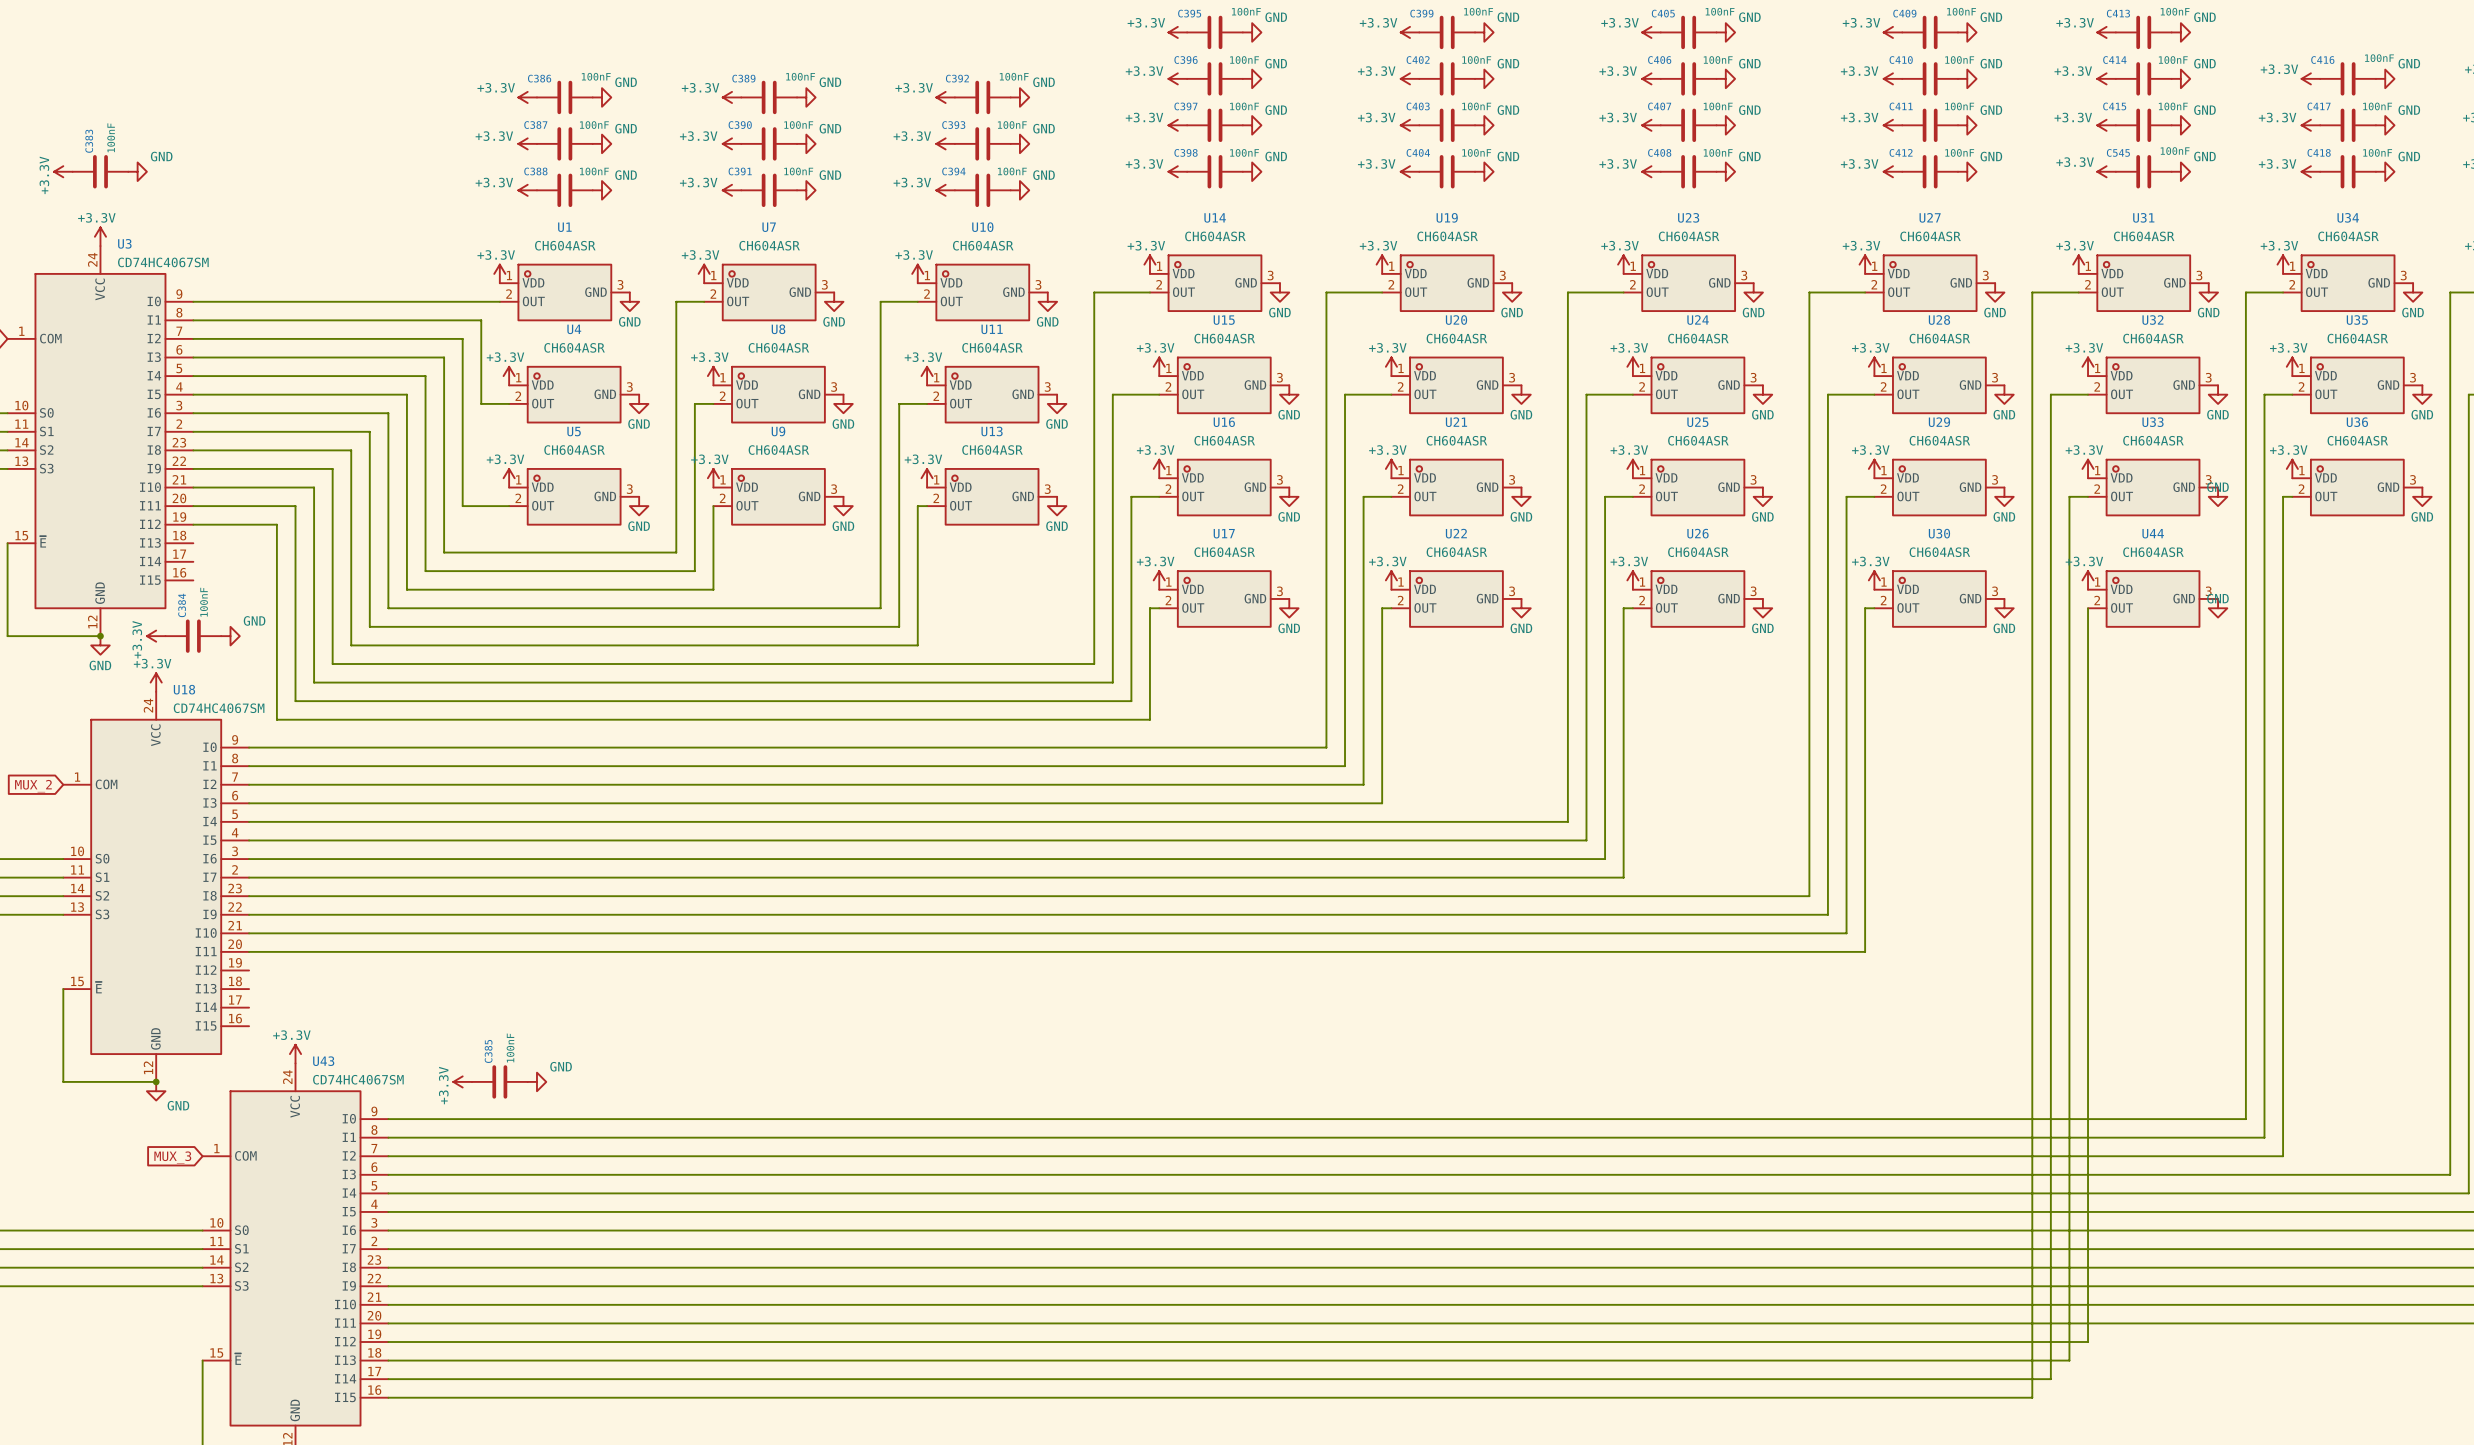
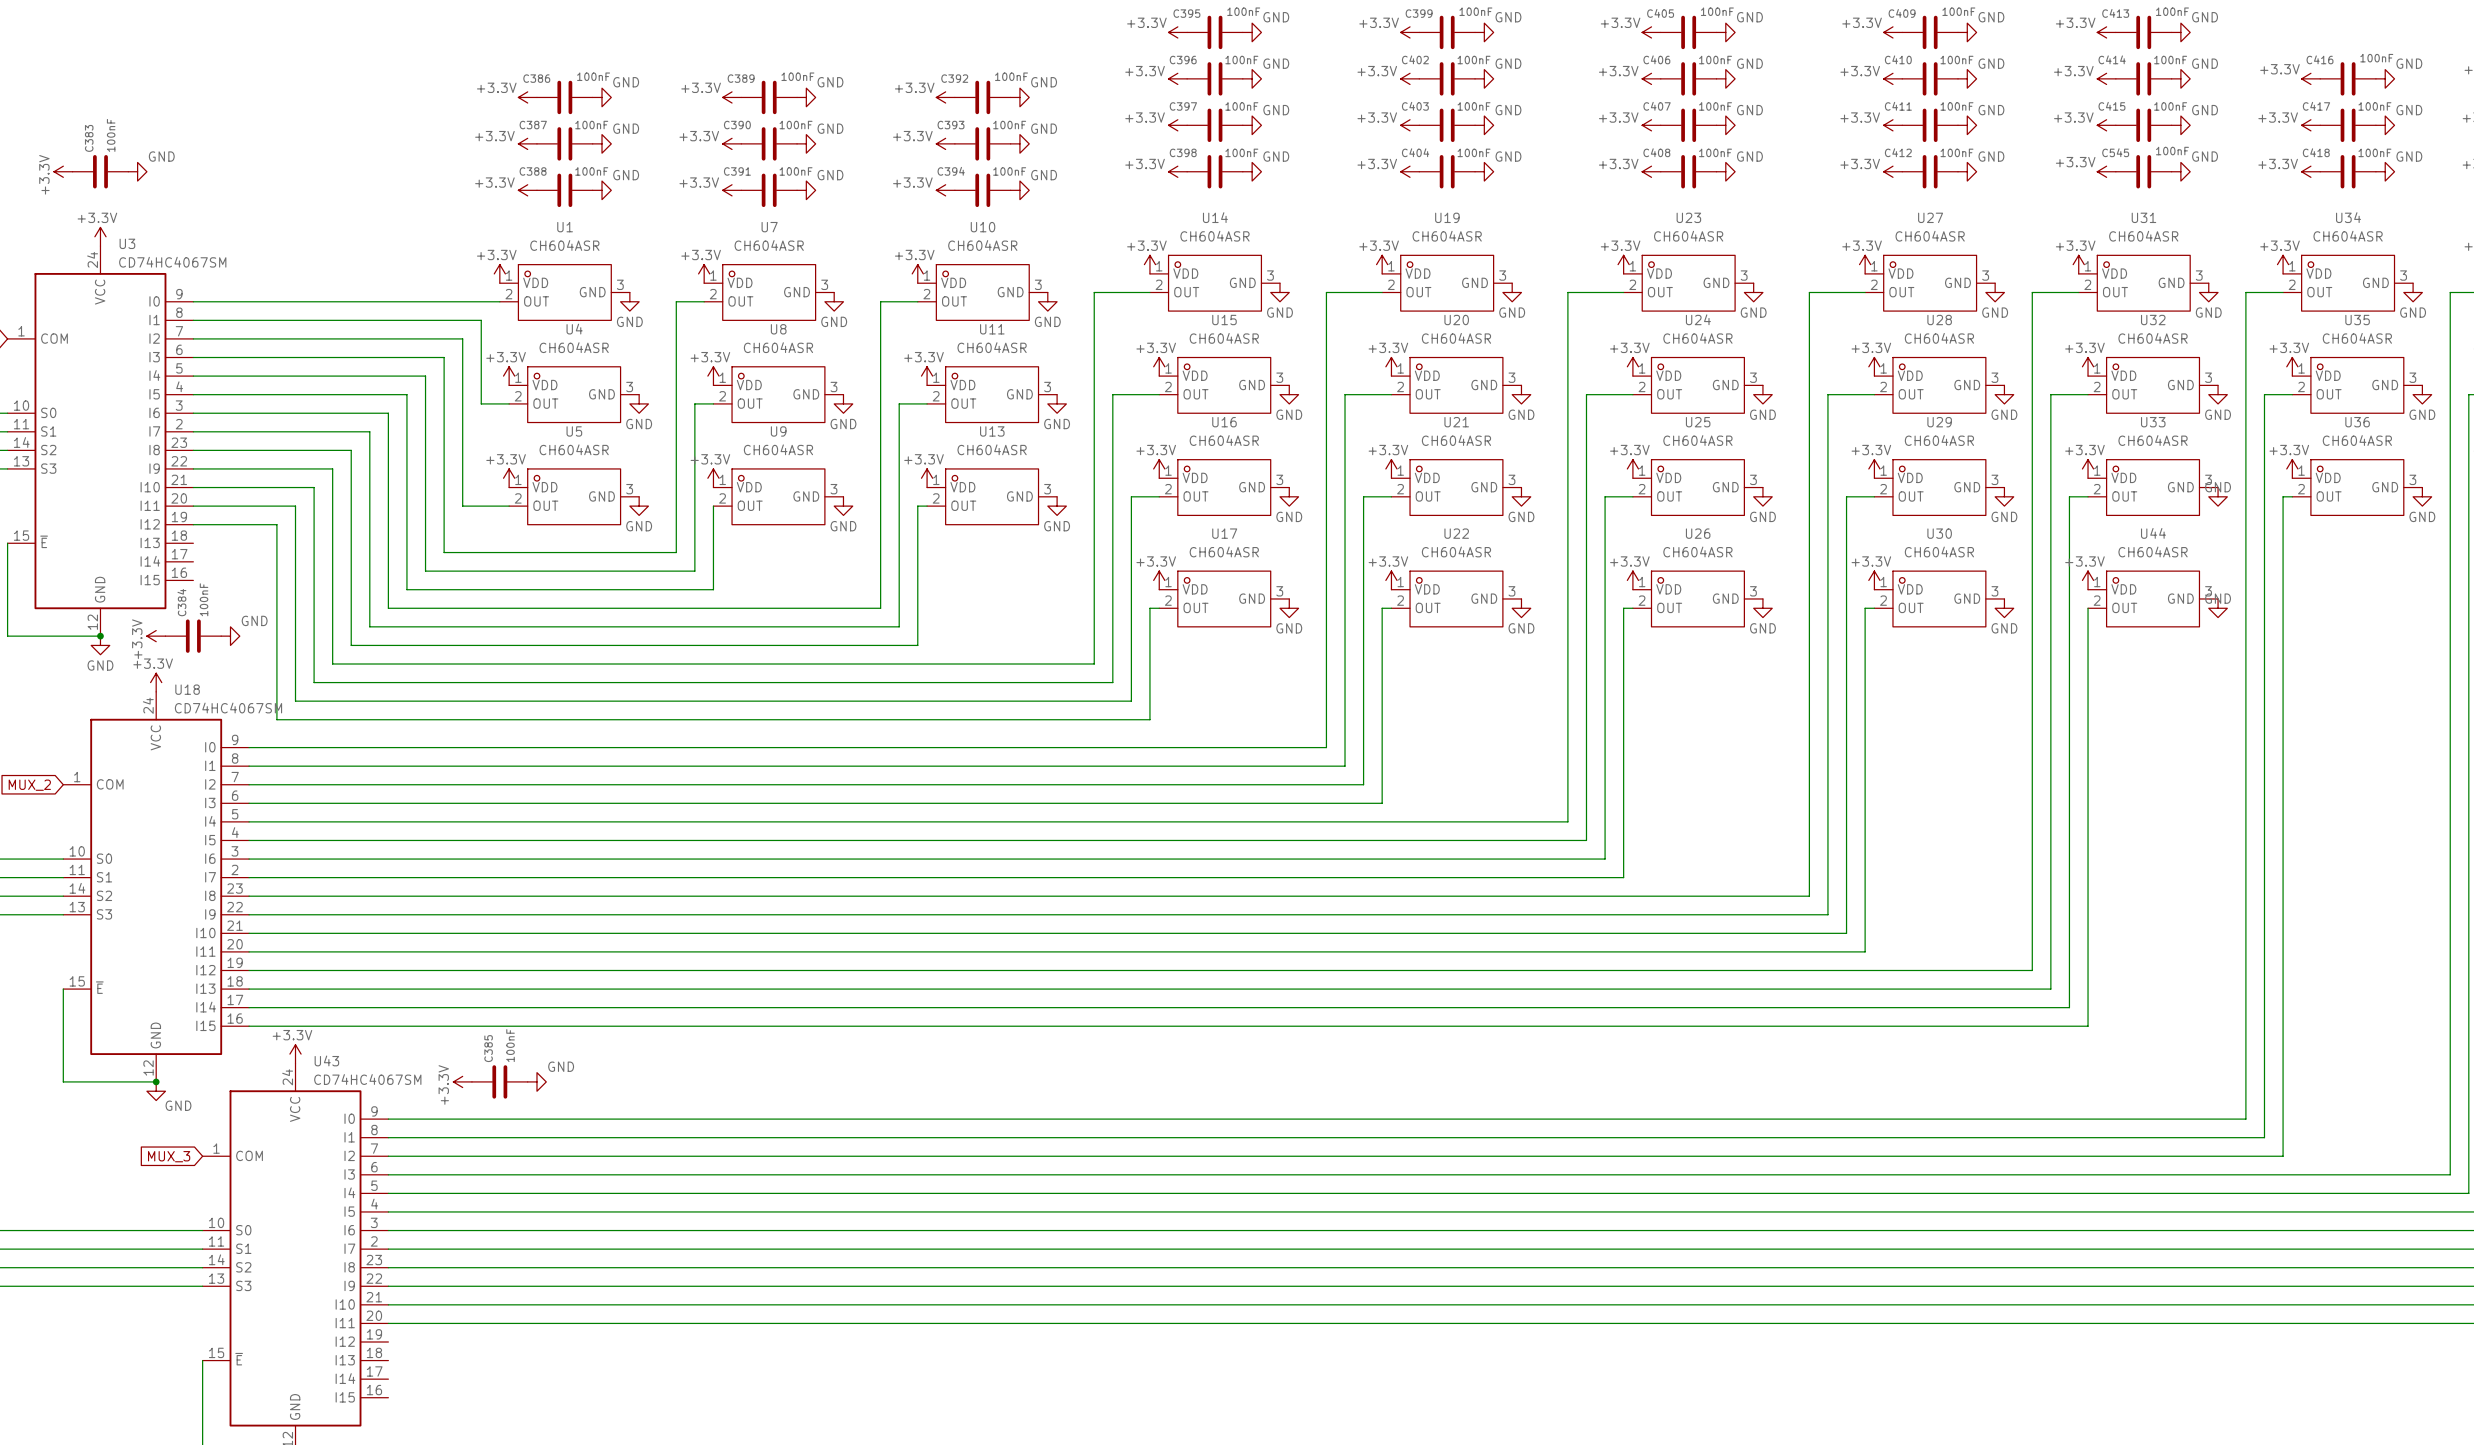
wire: (2032, 970) (2032, 1397) (388, 1397) -> (2032, 970) (249, 970)
wire: (2050, 989) (2050, 1379) (388, 1379) -> (2050, 989) (249, 989)
wire: (2069, 1007) (2069, 1360) (388, 1360) -> (2069, 1007) (249, 1007)
wire: (2088, 1026) (2088, 1341) (388, 1341) -> (2088, 1026) (249, 1026)

